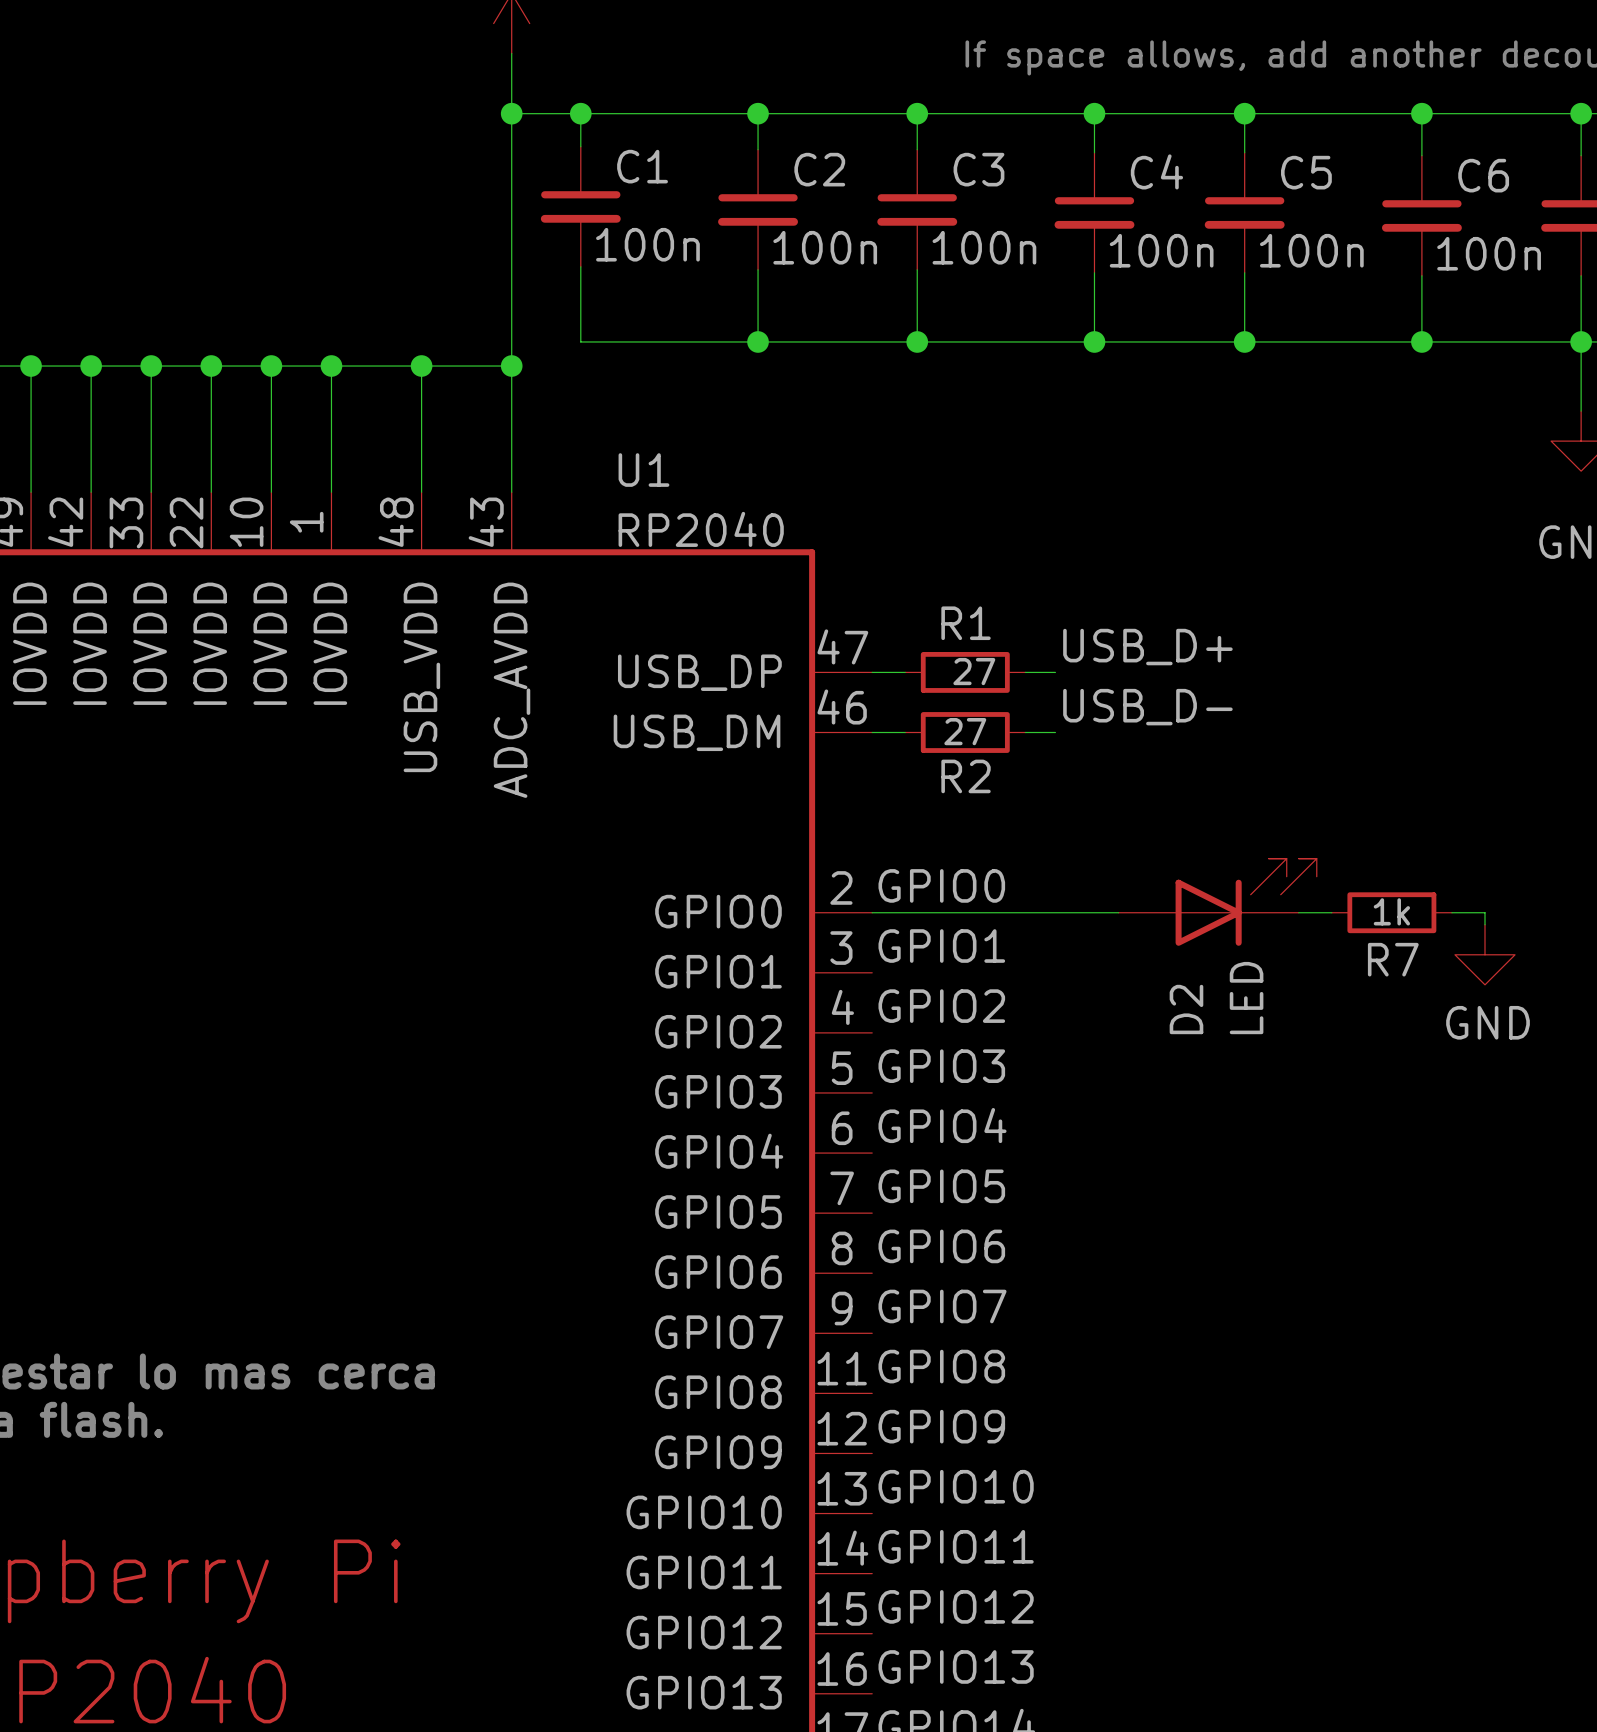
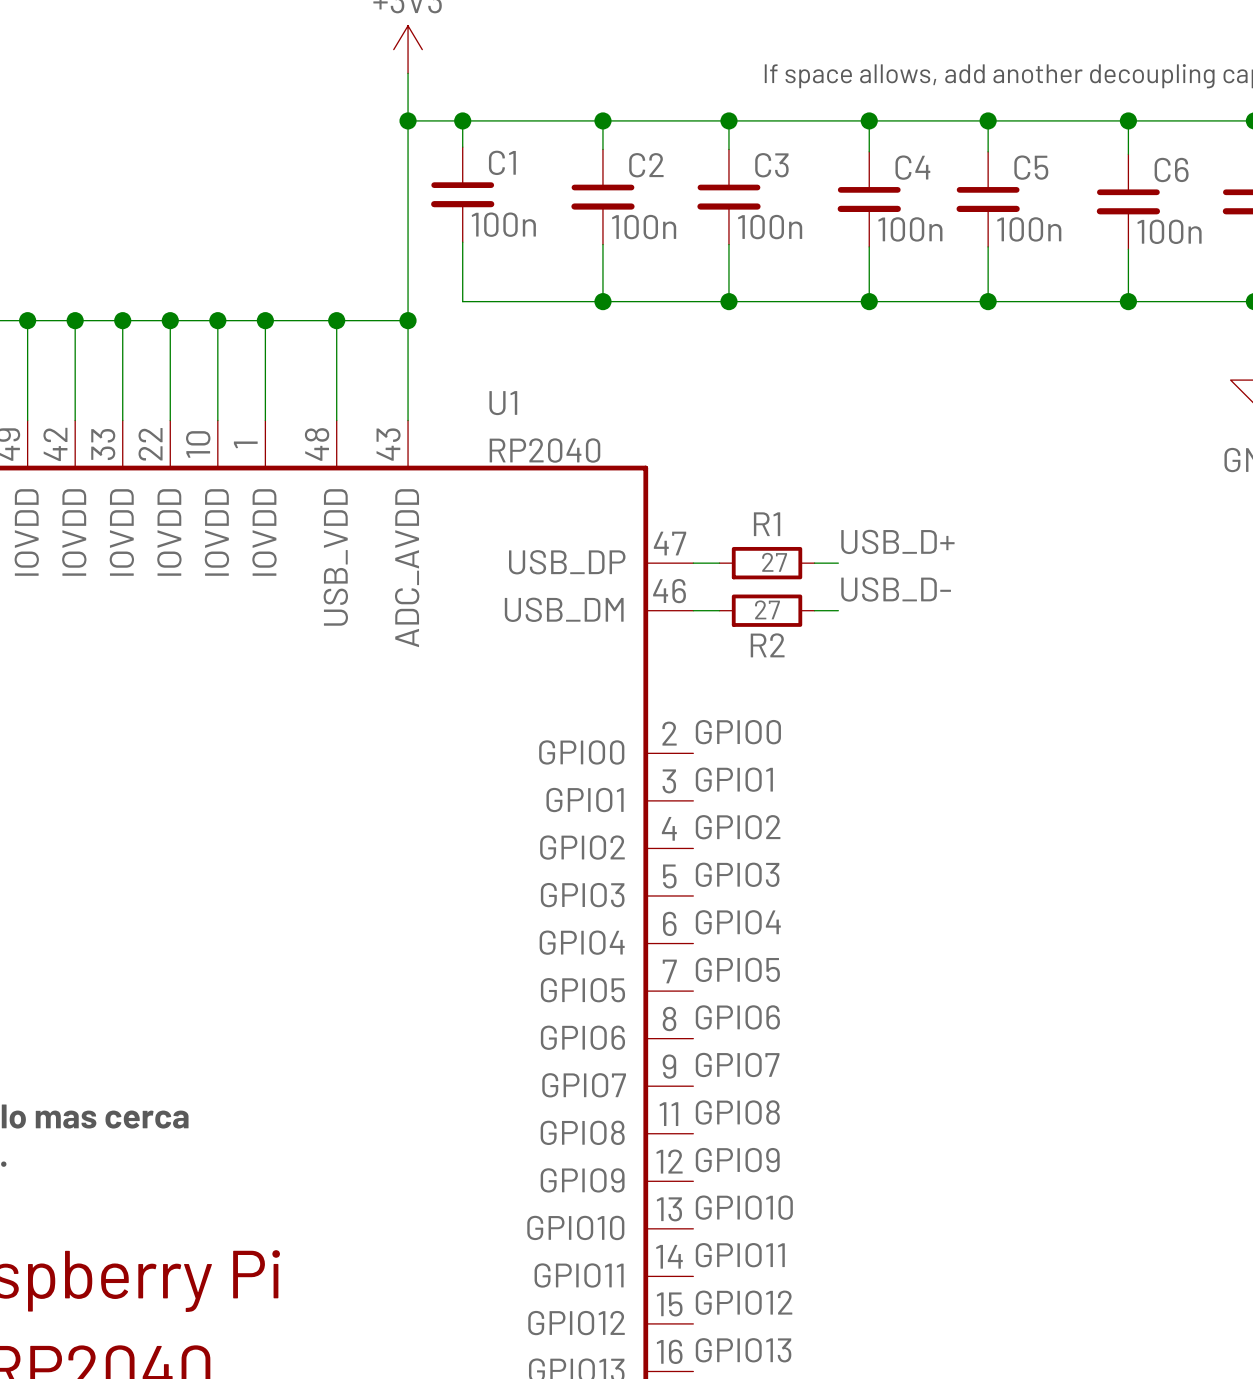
D2: LED (1217, 902) -> none
wire: (872, 912) (1118, 912) -> none
wire: (1298, 912) (1331, 912) -> none
R7: 1k (1391, 912) -> none
wire: (1451, 912) (1485, 912) (1485, 924) -> none
power symbol: GND (1485, 954) -> none

